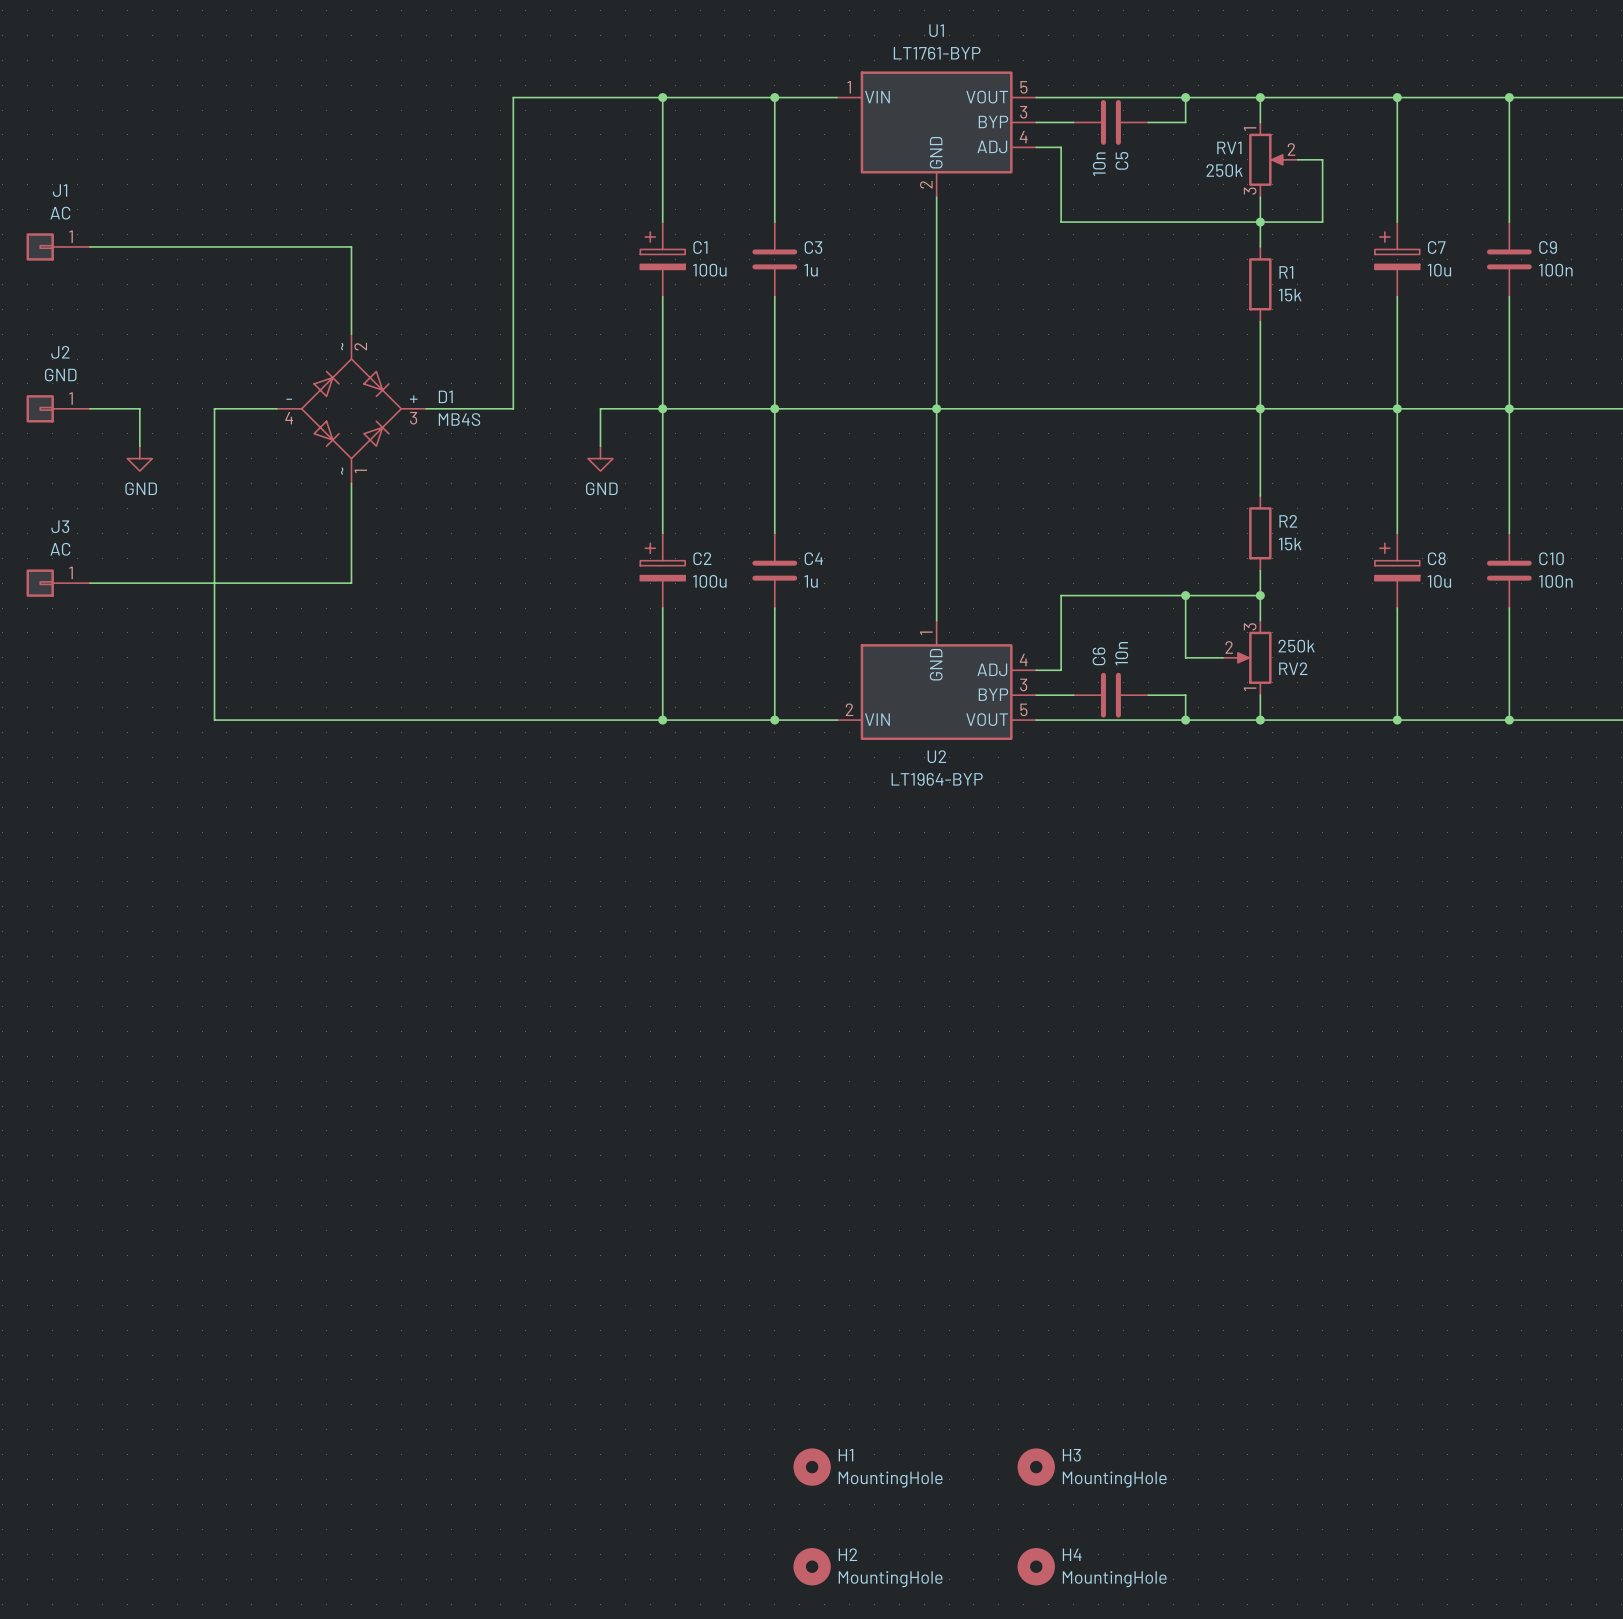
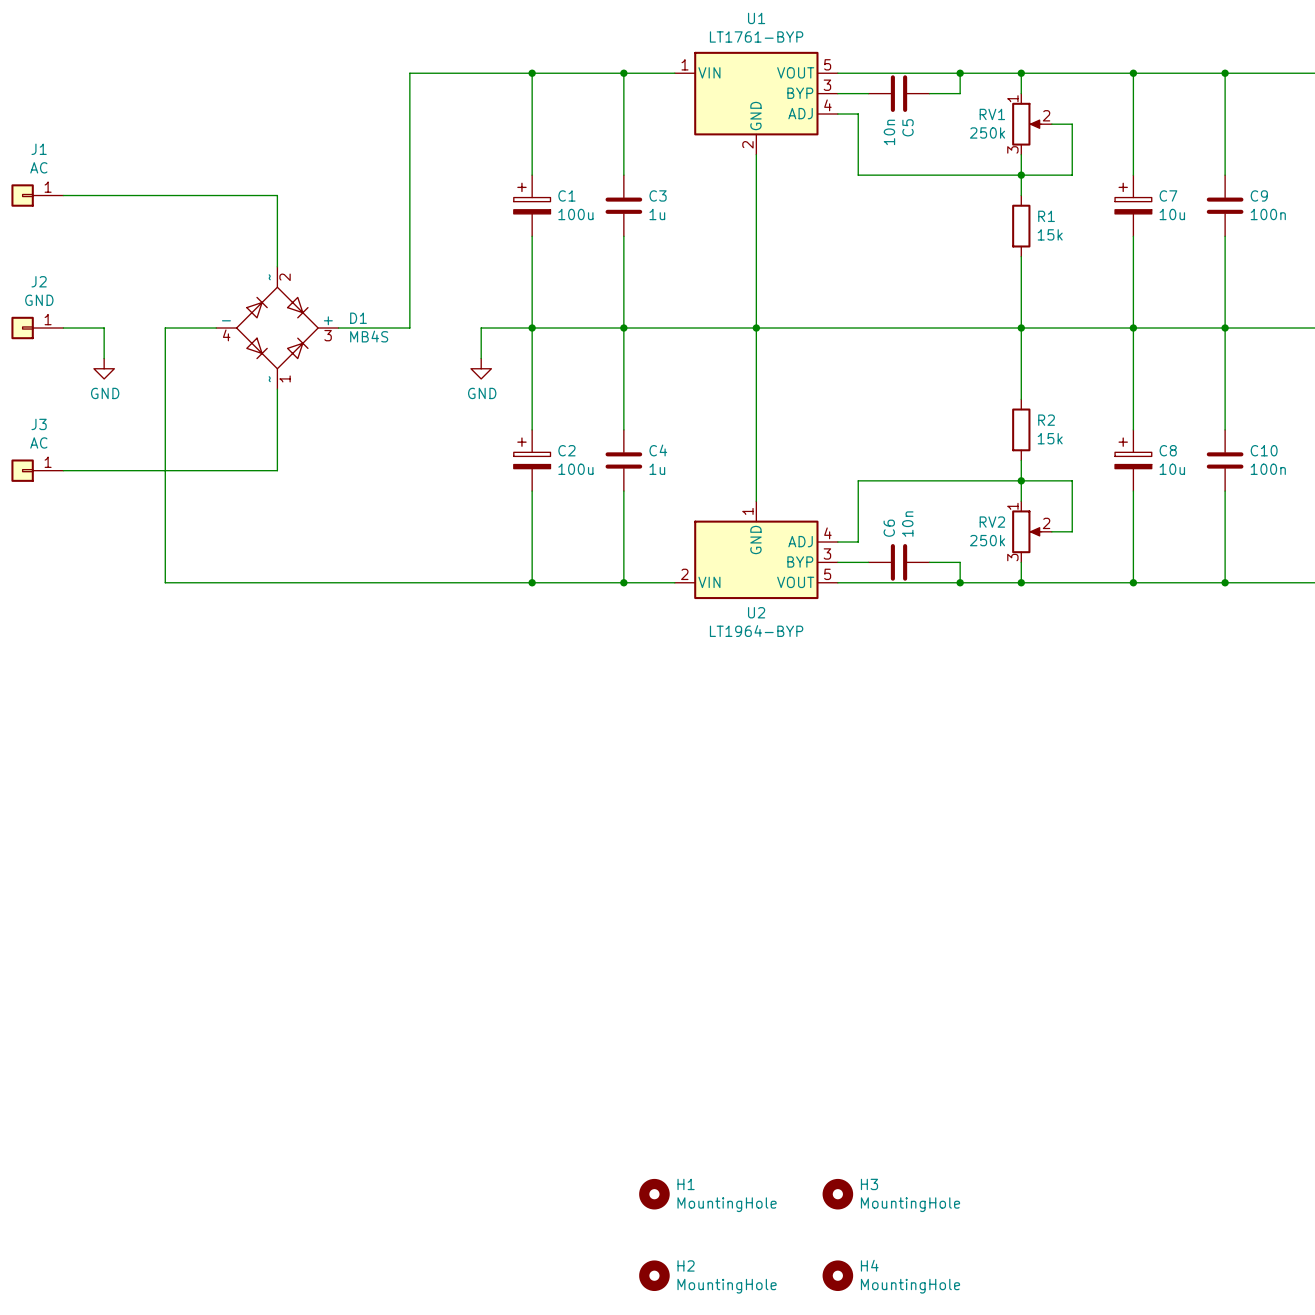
wire: (1185, 595) (1185, 657) (1223, 657) -> none
junction: (1185, 595) -> none
wire: none -> (1021, 480) (1072, 480) (1072, 531) (1051, 531)
RV2 rotation: 0° (1253, 657) -> 180° (1026, 531)

